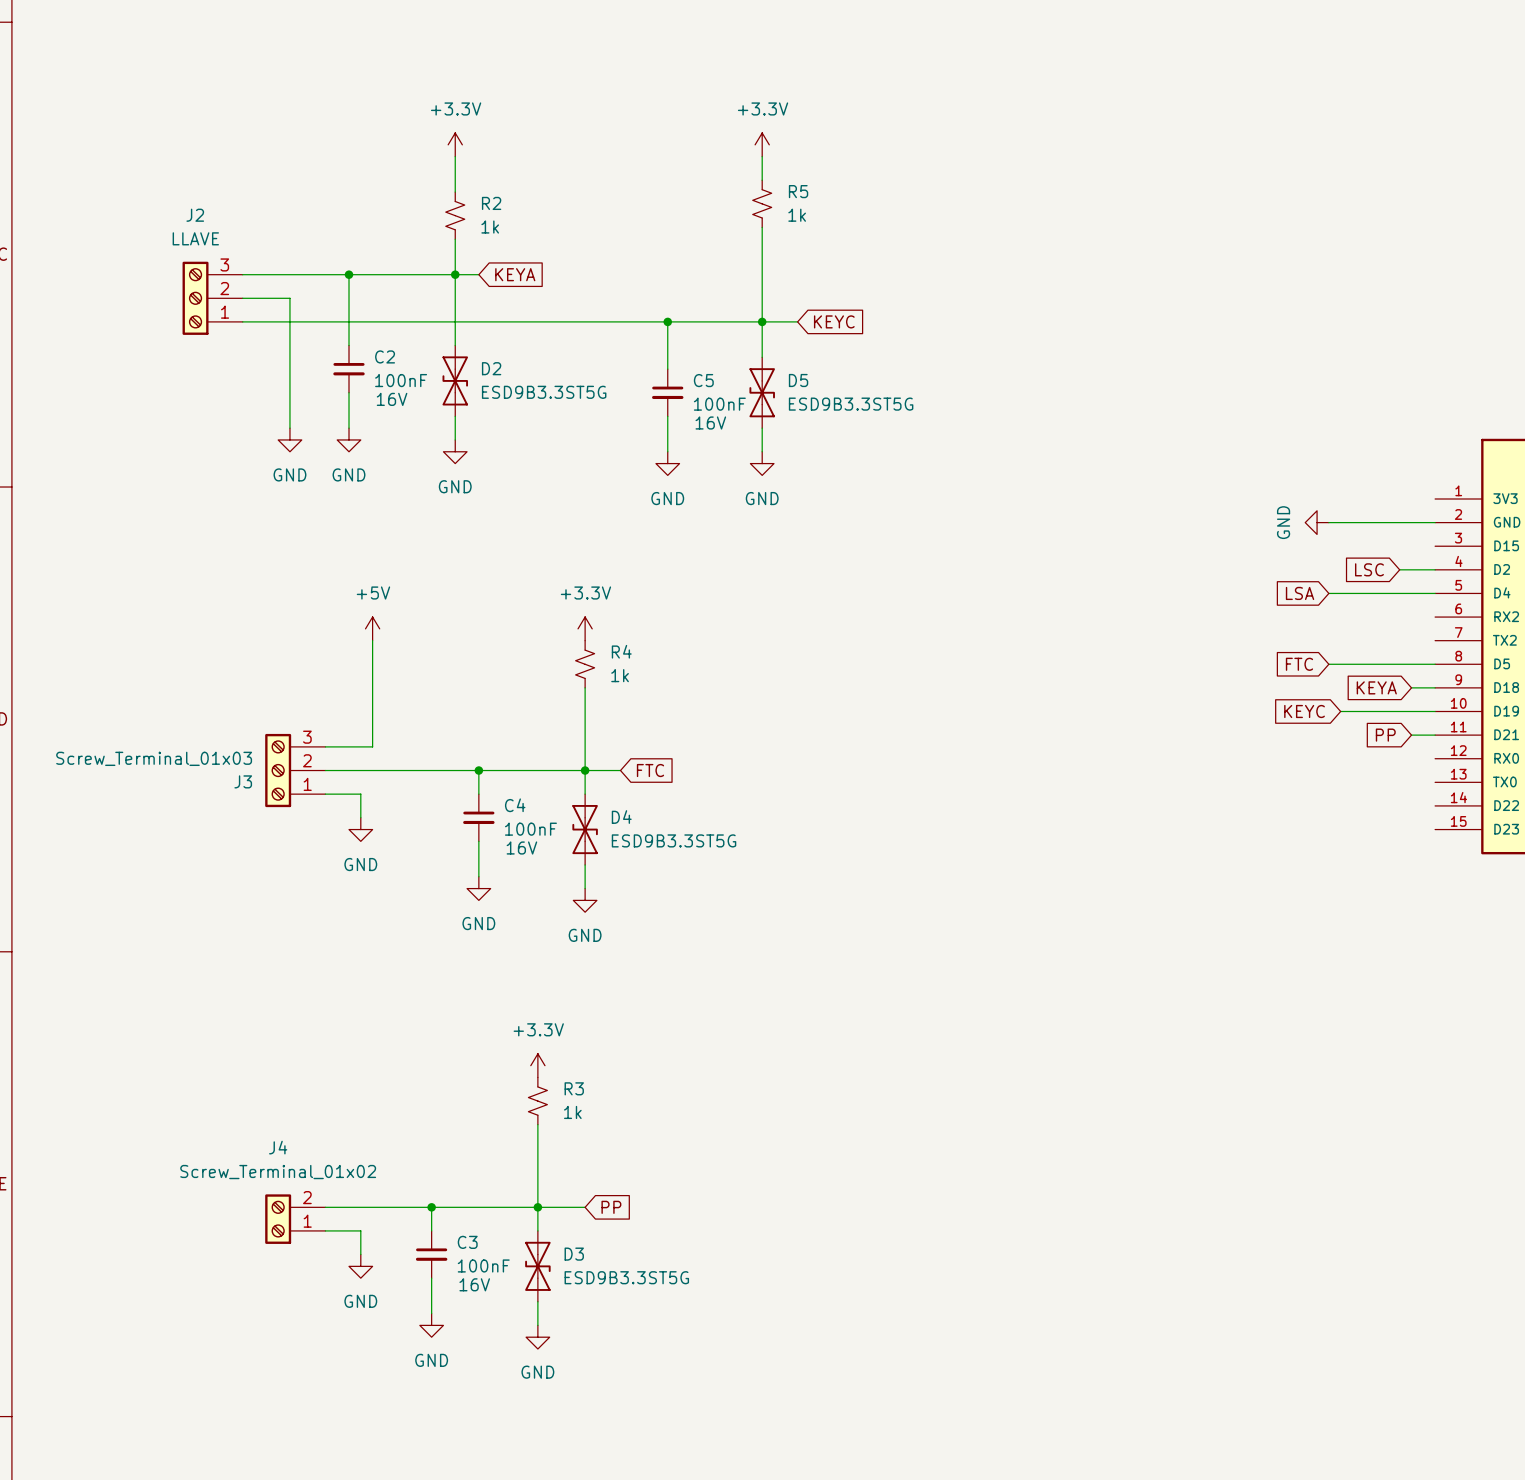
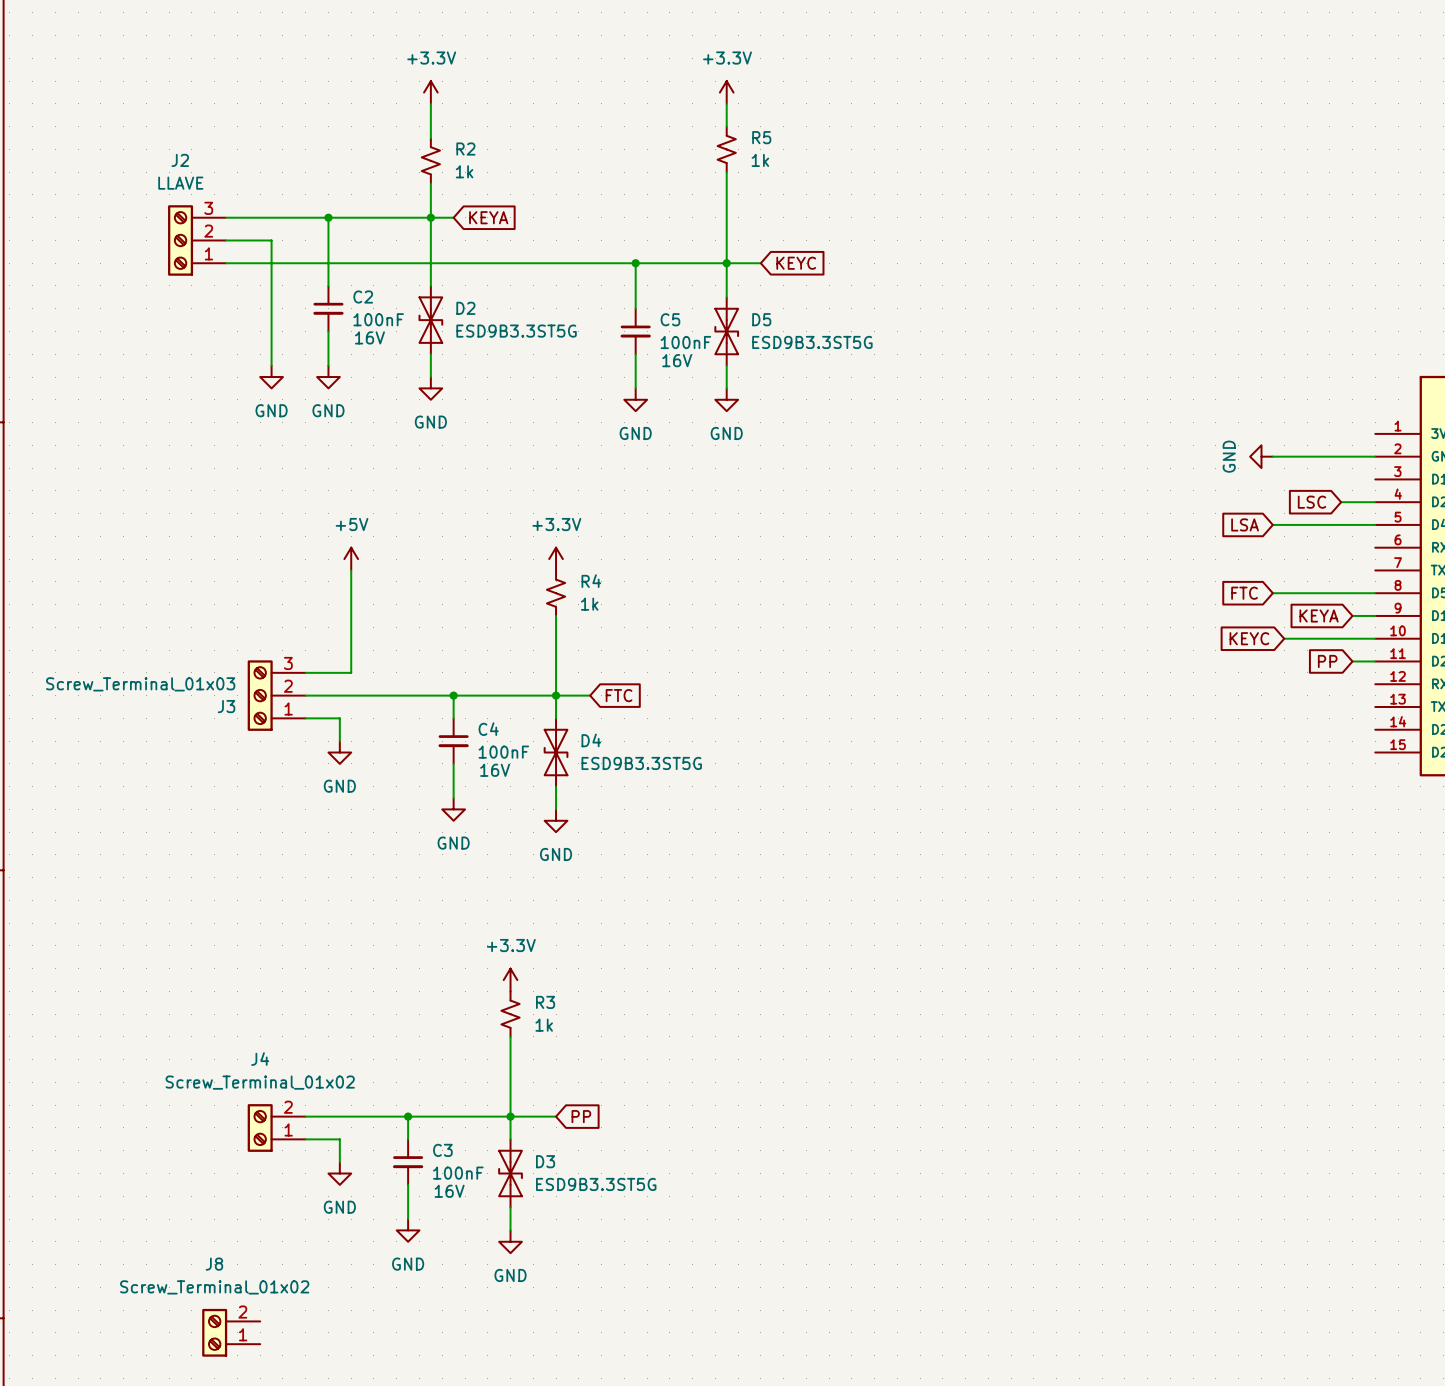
J8: none -> Screw_Terminal_01x02 (231, 1332)

